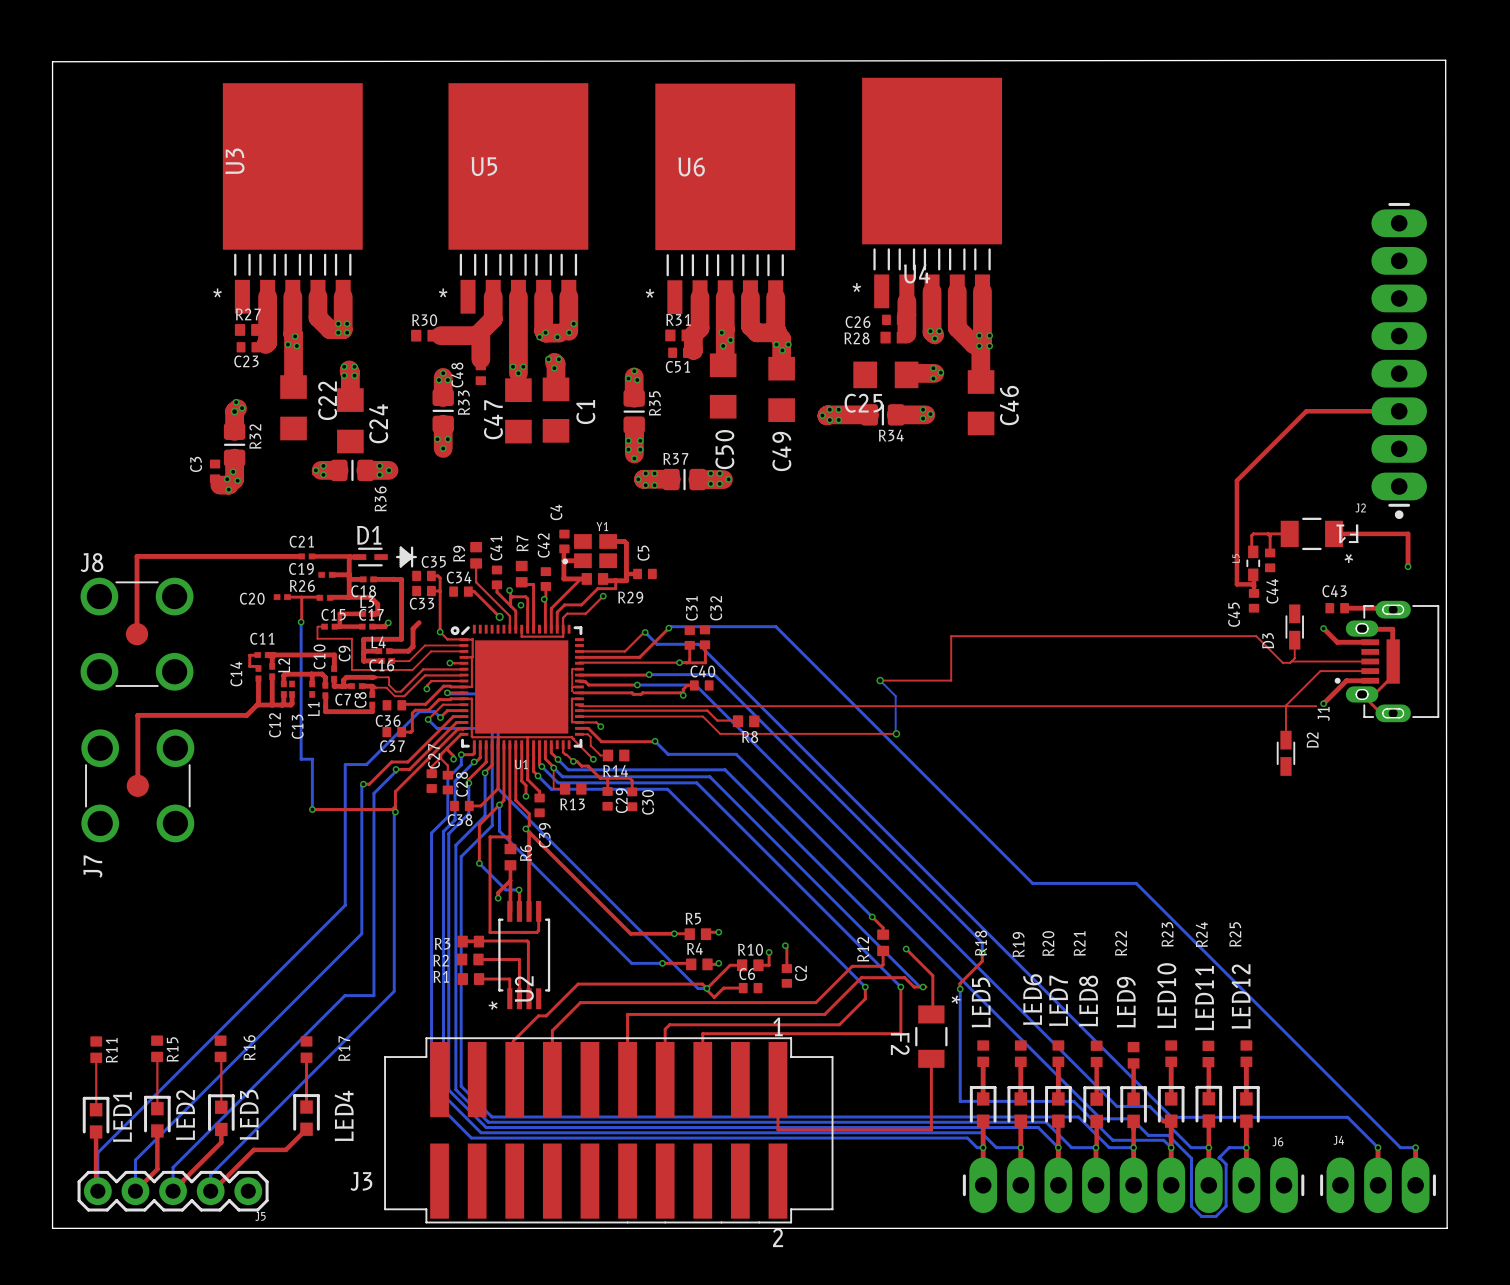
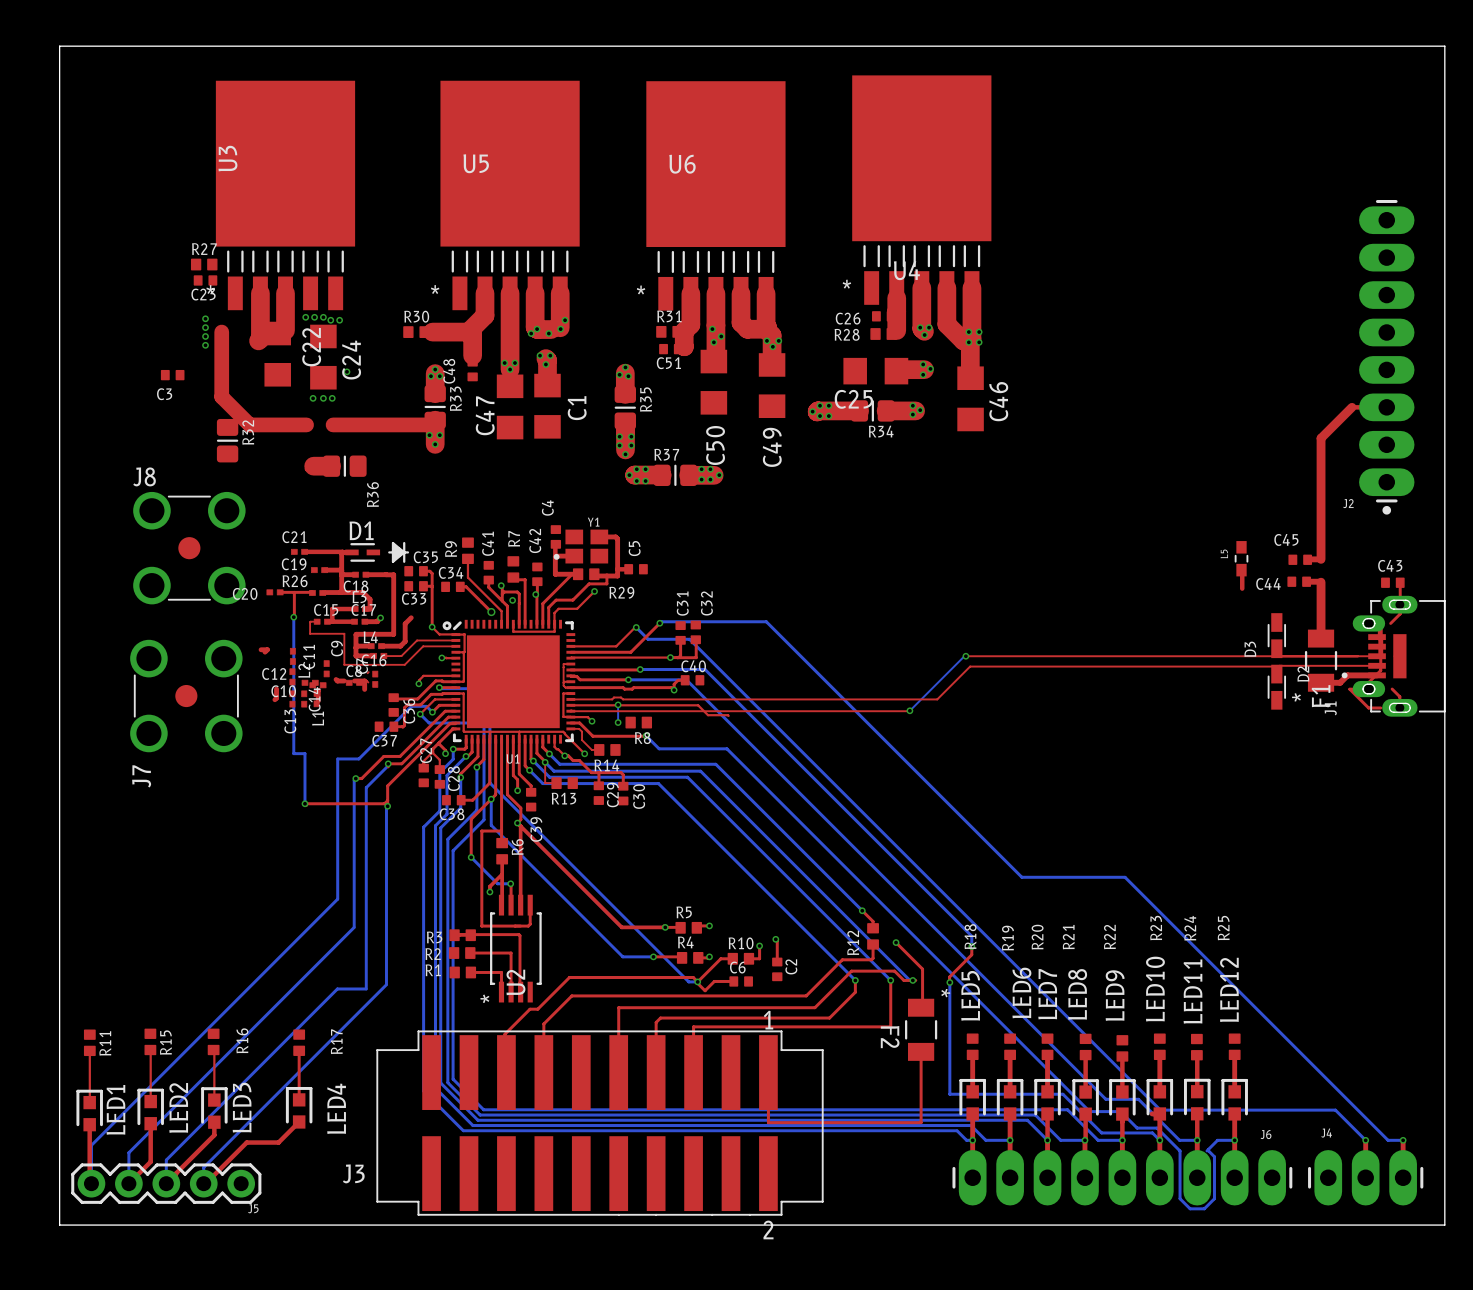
board edge: (1445, 60) (1447, 1228) (52, 1228) (52, 61) (1445, 60) -> (59, 46) (59, 1225) (1444, 1225) (1444, 46) (59, 46)
top track: (317, 296) (317, 317) (329, 329) (343, 329) (343, 296) -> none
via: none -> (305, 317)
via: none -> (314, 317)
via: none -> (323, 317)
via: none -> (205, 318)
R27 position: (248, 329) -> (204, 264)
via: none -> (205, 327)
via: (338, 332) -> none
via: (347, 332) -> none
top track: none -> (221, 332) (221, 396) (249, 424) (306, 424)
top track: (295, 336) (292, 334) (293, 387) (292, 385) -> none
via: (295, 336) -> none
via: none -> (205, 336)
via: (287, 344) -> none
via: (296, 345) -> none
C23 position: (248, 347) -> (205, 280)
via: none -> (205, 345)
via: (344, 366) -> none
via: (354, 366) -> none
top track: (349, 369) (350, 400) -> none
via: (344, 375) -> none
via: (236, 402) -> none
via: none -> (313, 398)
via: none -> (323, 398)
via: none -> (332, 398)
top track: (237, 405) (234, 411) (234, 431) -> none
C22 position: (293, 407) -> (277, 354)
via: (242, 408) -> none
via: (234, 411) -> none
top track: (1364, 411) (1306, 411) (1236, 480) (1236, 584) (1254, 585) -> (1351, 407) (1321, 438) (1321, 559) (1307, 559)
C24 position: (350, 420) -> (323, 357)
top track: none -> (435, 420) (430, 424) (333, 424)
top track: (234, 458) (234, 479) (228, 485) (219, 485) -> none
C3 name position: C3 (196, 464) -> C3 (164, 394)
via: (323, 465) -> none
via: (379, 465) -> none
via: (315, 470) -> none
top track: (365, 470) (389, 470) -> none
via: (389, 470) -> none
C3 rotation: 0° (215, 471) -> 90° clockwise (172, 375)
C3 position: (215, 471) -> (172, 375)
via: (233, 471) -> none
via: (323, 474) -> none
via: (379, 474) -> none
via: (227, 479) -> none
via: (237, 480) -> none
via: (228, 489) -> none
top track: (1327, 531) (1330, 533) (1408, 533) (1408, 566) -> none
top track: (1268, 533) (1270, 536) (1270, 552) -> none
top track: (1289, 533) (1253, 533) (1251, 535) (1253, 551) -> none
F1 rotation: 0° (1311, 533) -> 90° clockwise (1321, 660)
F1 position: (1311, 533) -> (1321, 660)
top track: (301, 556) (137, 556) (137, 634) -> none
C44 rotation: 0° (1270, 560) -> 90° clockwise (1299, 581)
C44 position: (1270, 560) -> (1299, 581)
via: (1408, 566) -> none
top track: none -> (1306, 581) (1321, 582) (1321, 638)
top track: none -> (1400, 582) (1400, 613) (1390, 623)
C45 rotation: 0° (1254, 600) -> 90° clockwise (1300, 559)
C45 position: (1254, 600) -> (1300, 559)
C43 position: (1337, 608) -> (1392, 582)
top track: (1344, 608) (1387, 608) (1390, 611) (1393, 609) -> none
D3 position: (1294, 627) -> (1276, 635)
top track: (1323, 628) (1337, 642) (1370, 642) -> none
via: (1323, 628) -> none
J8 position: (137, 634) -> (189, 548)
top track: (1294, 640) (1294, 658) (1290, 662) (1282, 662) (1256, 636) (951, 636) (951, 680) (880, 680) -> none
top track: none -> (1276, 648) (1276, 656) (965, 656)
top track: (257, 654) (249, 655) (249, 666) (258, 666) -> none
C11 rotation: 0° (262, 654) -> 90° clockwise (292, 656)
C11 position: (262, 654) -> (292, 656)
C10 name position: C10 (319, 656) -> C10 (283, 691)
top track: none -> (1276, 654) (1278, 656) (1377, 656)
bottom track: none -> (965, 656) (909, 710)
via: none -> (965, 656)
J1 position: (1386, 661) -> (1393, 656)
top track: (272, 666) (272, 654) (334, 654) (334, 668) -> none
top track: (465, 669) (423, 669) (401, 691) (395, 691) (389, 685) (388, 677) (372, 677) -> none
top track: none -> (1377, 665) (1279, 665) (1276, 668)
L2 position: (272, 671) -> (292, 676)
top track: (1370, 671) (1320, 671) (1285, 705) (1285, 740) -> none
C14 position: (258, 673) -> (292, 698)
C14 name position: C14 (236, 674) -> C14 (314, 699)
top track: (311, 674) (285, 674) (283, 683) -> none
top track: (461, 675) (425, 675) (404, 696) (394, 696) (386, 687) (373, 687) -> none
top track: (272, 676) (272, 705) -> none
top track: (373, 677) (346, 677) (343, 680) (342, 686) (334, 686) (334, 679) -> none
top track: (258, 678) (258, 703) (246, 715) (137, 715) (137, 785) -> none
bottom track: (880, 680) (895, 696) (896, 733) -> none
via: (880, 680) -> none
top track: (1370, 680) (1346, 680) (1323, 703) -> none
top track: none -> (1377, 675) (1347, 675) (1340, 682) (1321, 682)
top track: (312, 683) (311, 674) (322, 674) (325, 677) (324, 684) -> none
C7 rotation: 0° (356, 686) -> 90° clockwise (375, 679)
C7 position: (356, 686) -> (375, 679)
C12 rotation: 0° (283, 689) -> 90° clockwise (310, 682)
C12 position: (283, 689) -> (310, 682)
C13 position: (292, 689) -> (304, 698)
L1 position: (312, 689) -> (316, 698)
C10 rotation: 0° (325, 690) -> 90° clockwise (317, 685)
top track: (292, 694) (290, 705) (257, 705) -> none
top track: none -> (1392, 689) (1399, 696) (1399, 707)
C8 rotation: 0° (372, 699) -> 90° clockwise (354, 682)
C8 position: (372, 699) -> (354, 682)
via: (1323, 703) -> none
top track: (579, 704) (1316, 706) -> (570, 699) (612, 699) (613, 697) (622, 699) (937, 699) (970, 666) (1275, 666) (1276, 668)
top track: (372, 705) (372, 711) (325, 711) (325, 706) -> none
C36 rotation: 0° (394, 705) -> 90° clockwise (393, 705)
bottom track: none -> (618, 704) (618, 722)
via: none -> (618, 704)
top track: (702, 716) (720, 733) (896, 733) -> (693, 711) (909, 710)
via: none -> (909, 710)
R8 position: (746, 721) -> (638, 722)
via: none -> (618, 722)
via: (896, 733) -> none
R8 name rotation: 0° (750, 736) -> 0.6° counterclockwise (642, 738)
D2 position: (1285, 753) -> (1276, 687)
J7 position: (137, 785) -> (186, 696)

